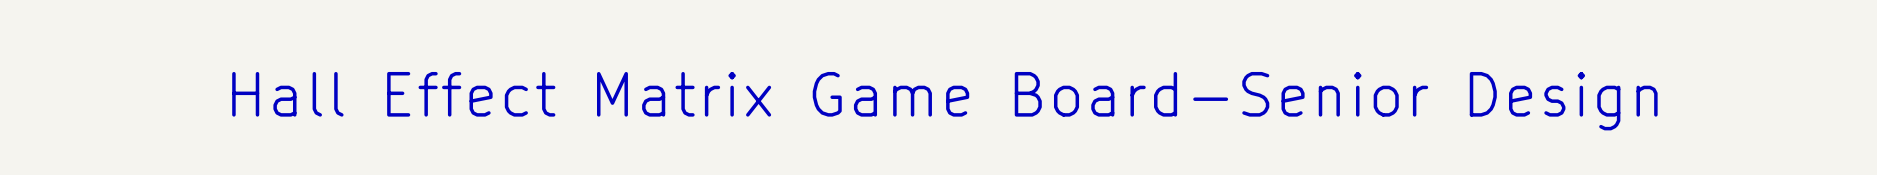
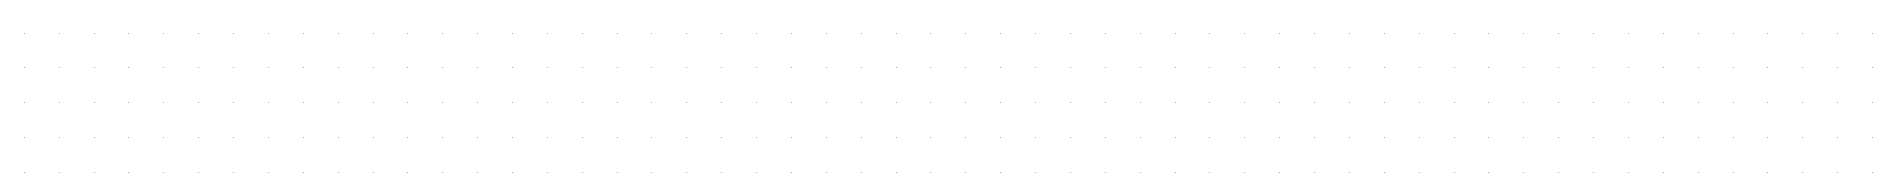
text: Hall Effect Matrix Game Board-Senior Design (944, 101) -> none

